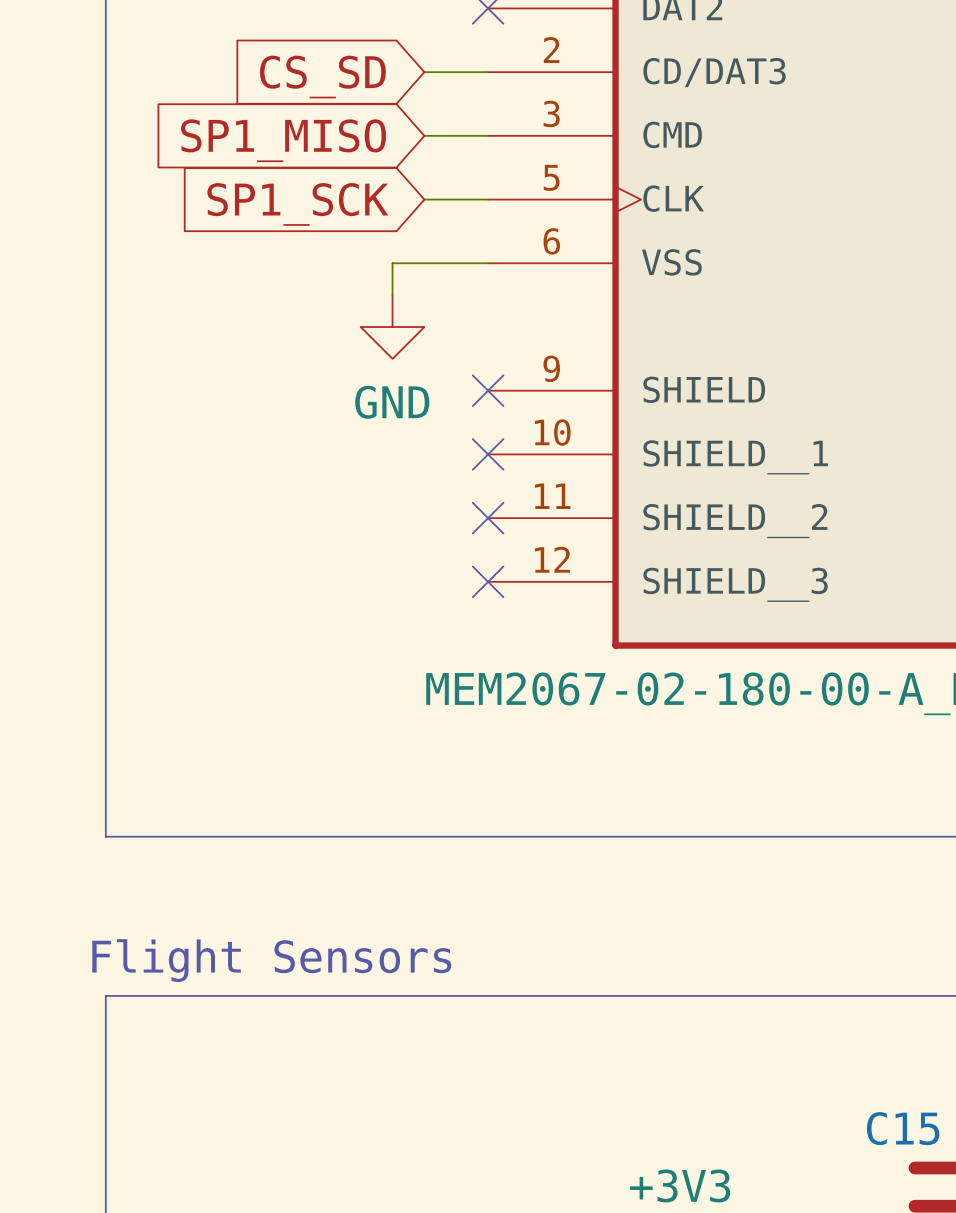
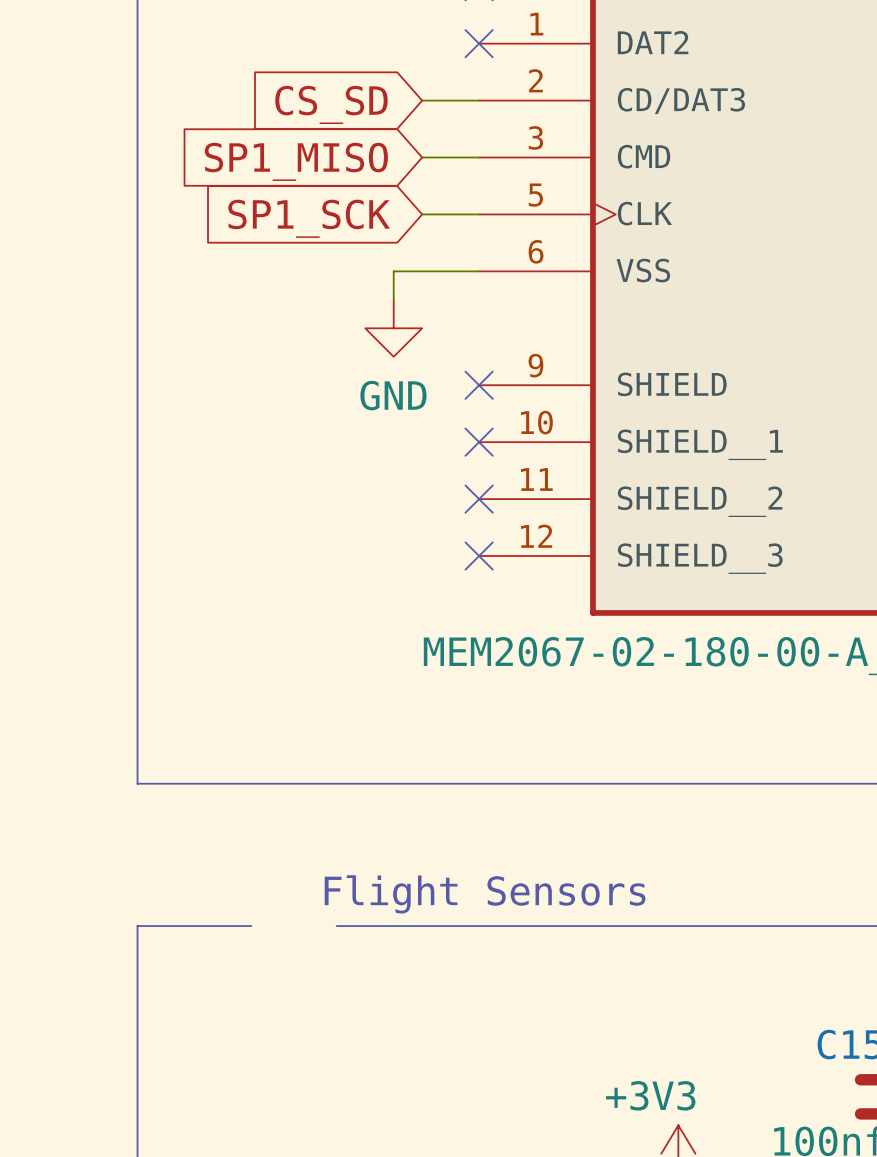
text position: Flight Sensors (271, 960) -> Flight Sensors (485, 894)
line: (233, 995) (328, 995) -> none

